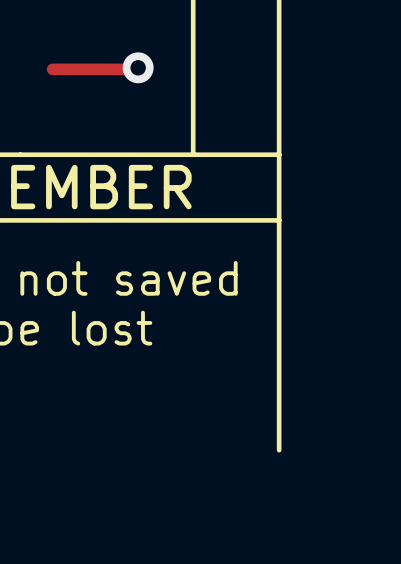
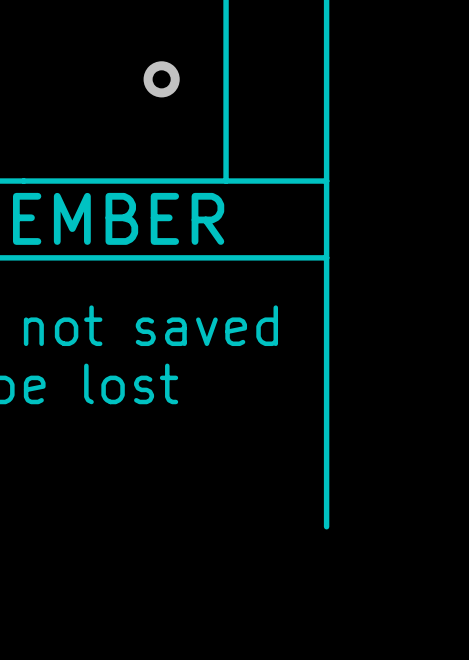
top track: (138, 67) (136, 69) (52, 69) -> none

